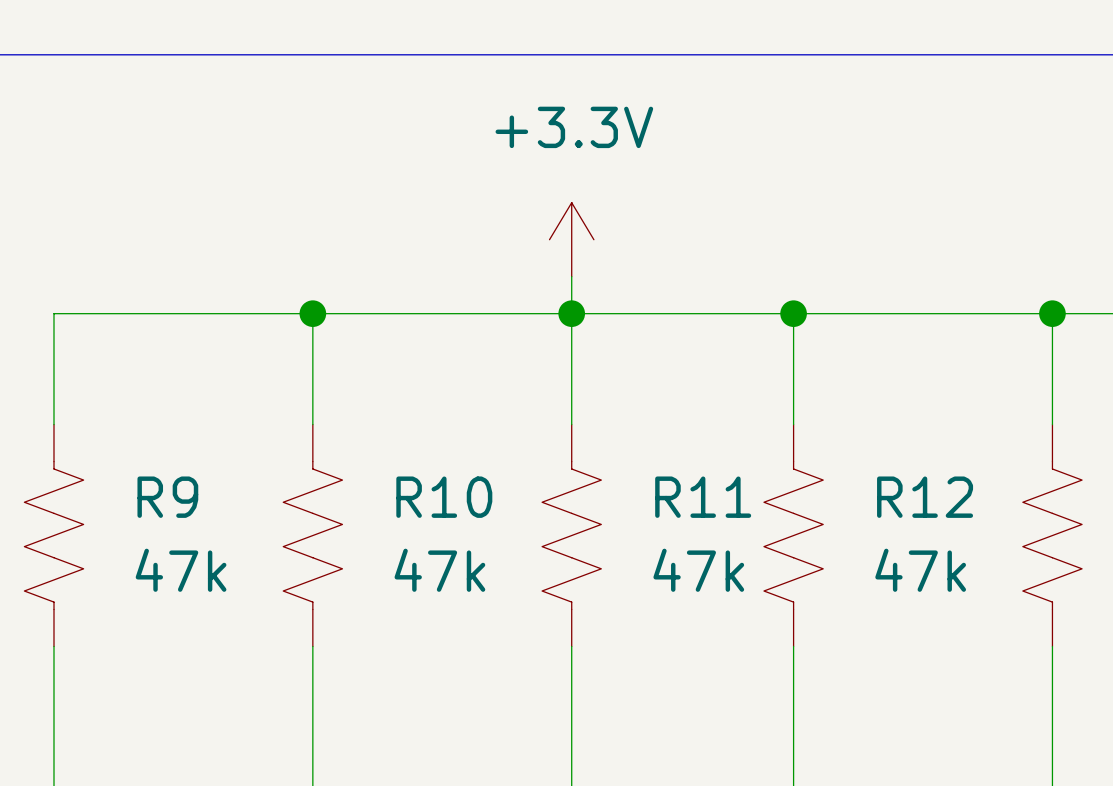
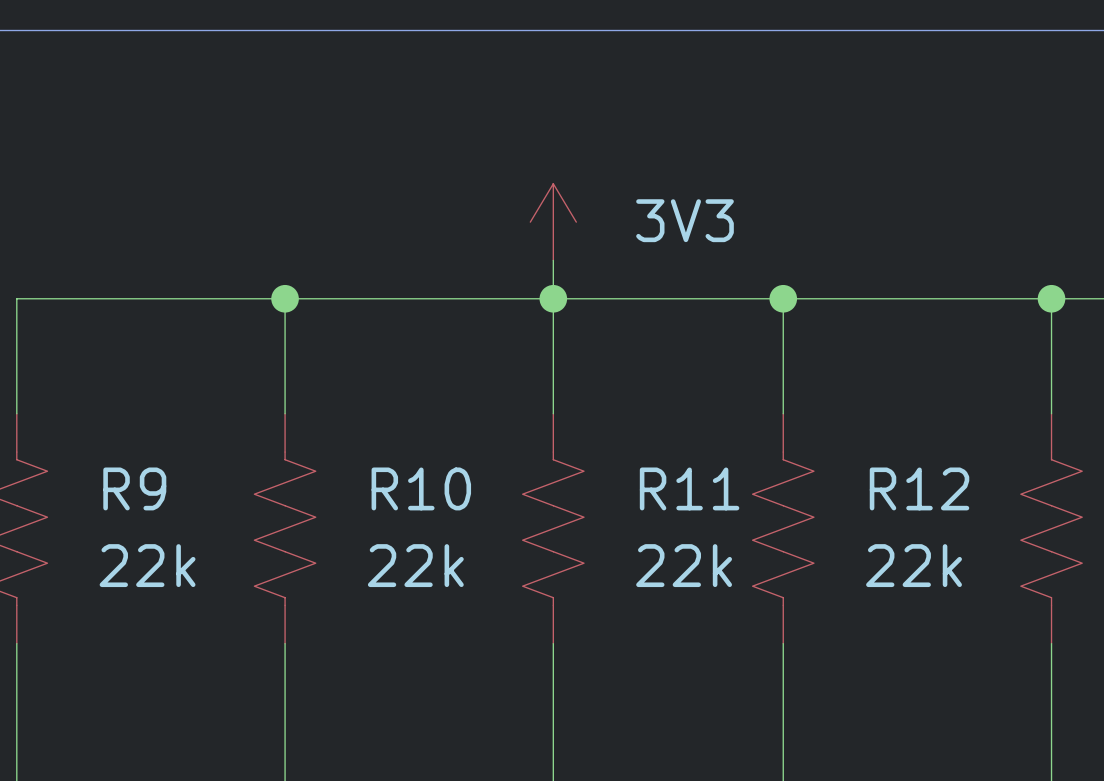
power symbol: +3.3V (571, 239) -> 3V3 (553, 222)
R9 value: 47k (181, 570) -> 22k (147, 565)
R10 value: 47k (439, 570) -> 22k (415, 565)
R11 value: 47k (698, 570) -> 22k (684, 565)
R12 value: 47k (920, 570) -> 22k (914, 565)

